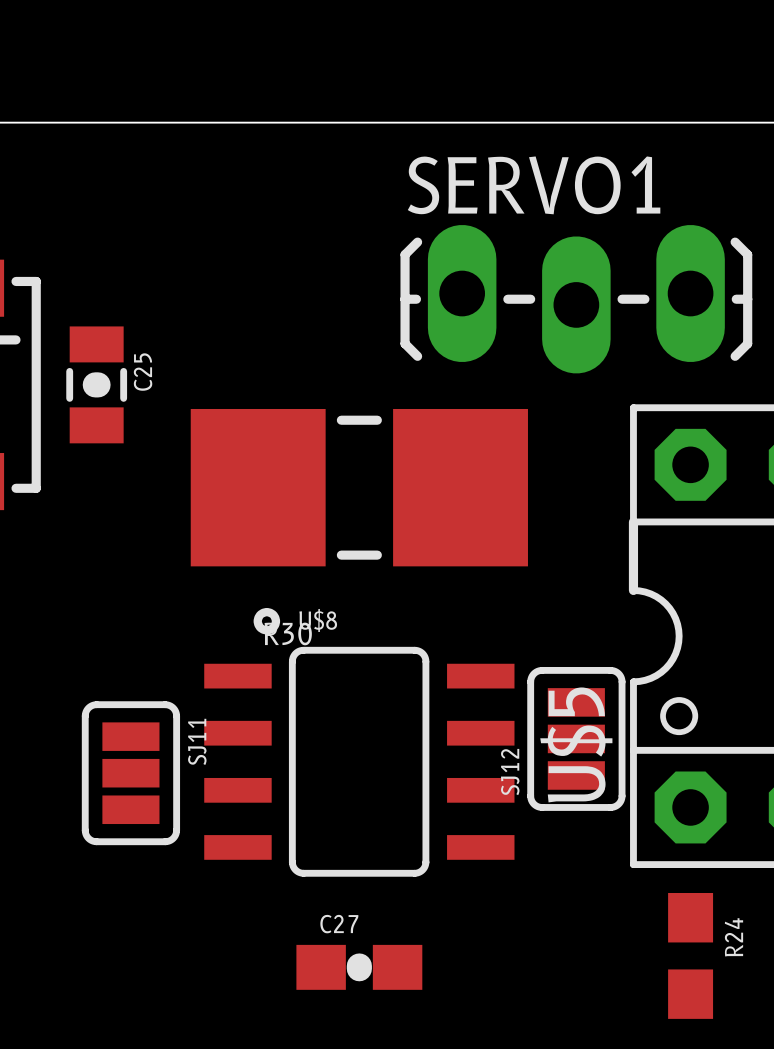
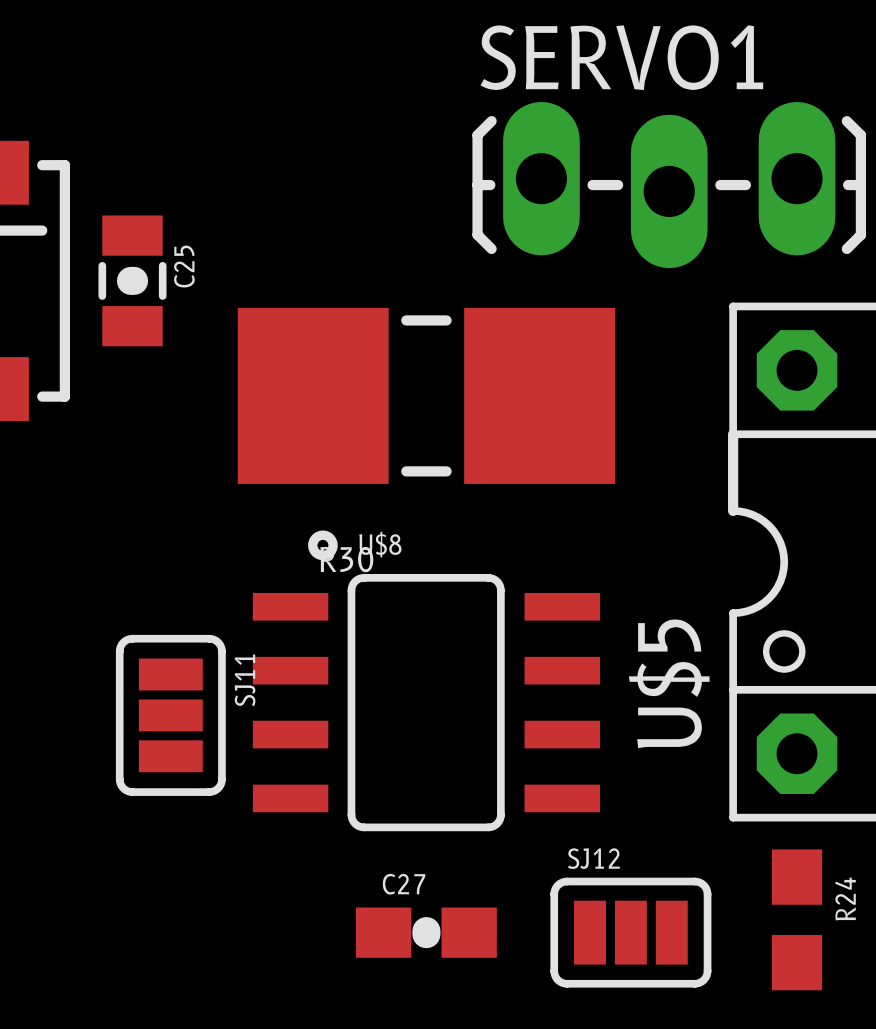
SJ12 rotation: 0° (576, 738) -> 90° clockwise (630, 932)
SJ12 position: (576, 738) -> (630, 932)

